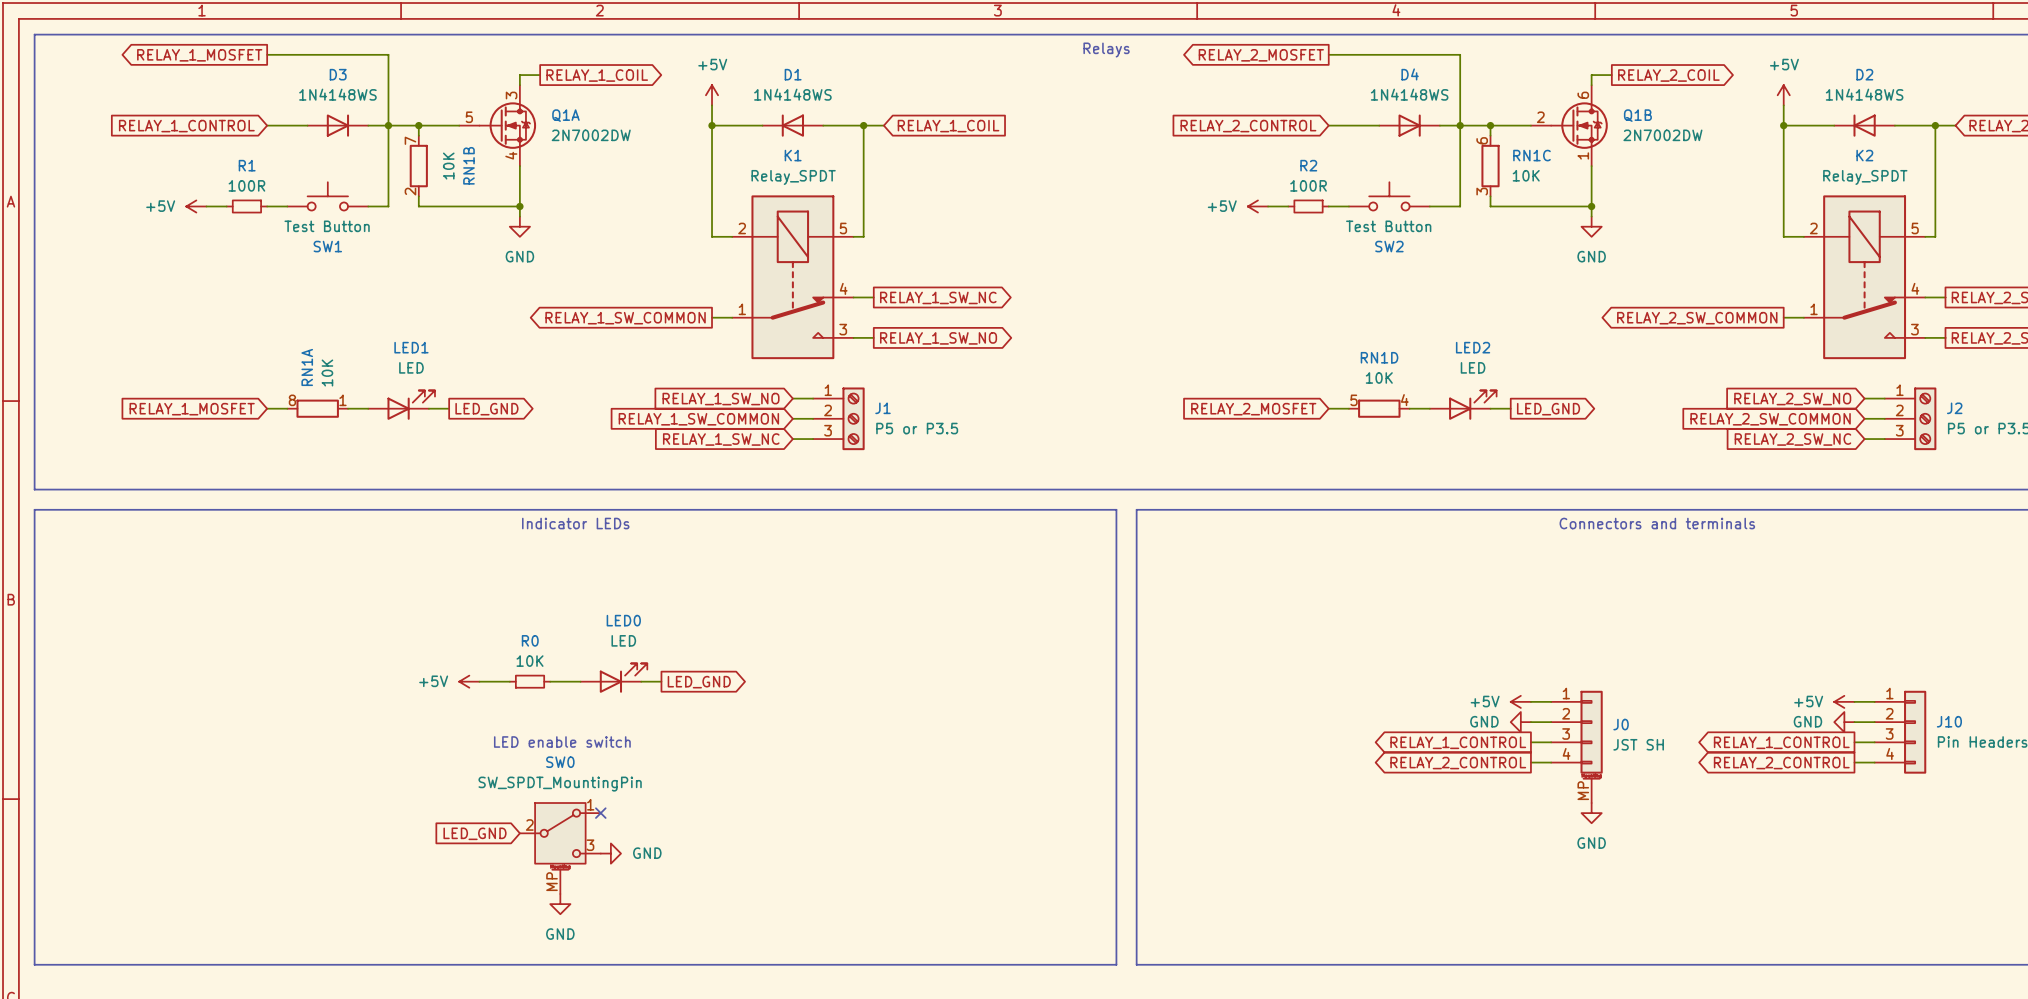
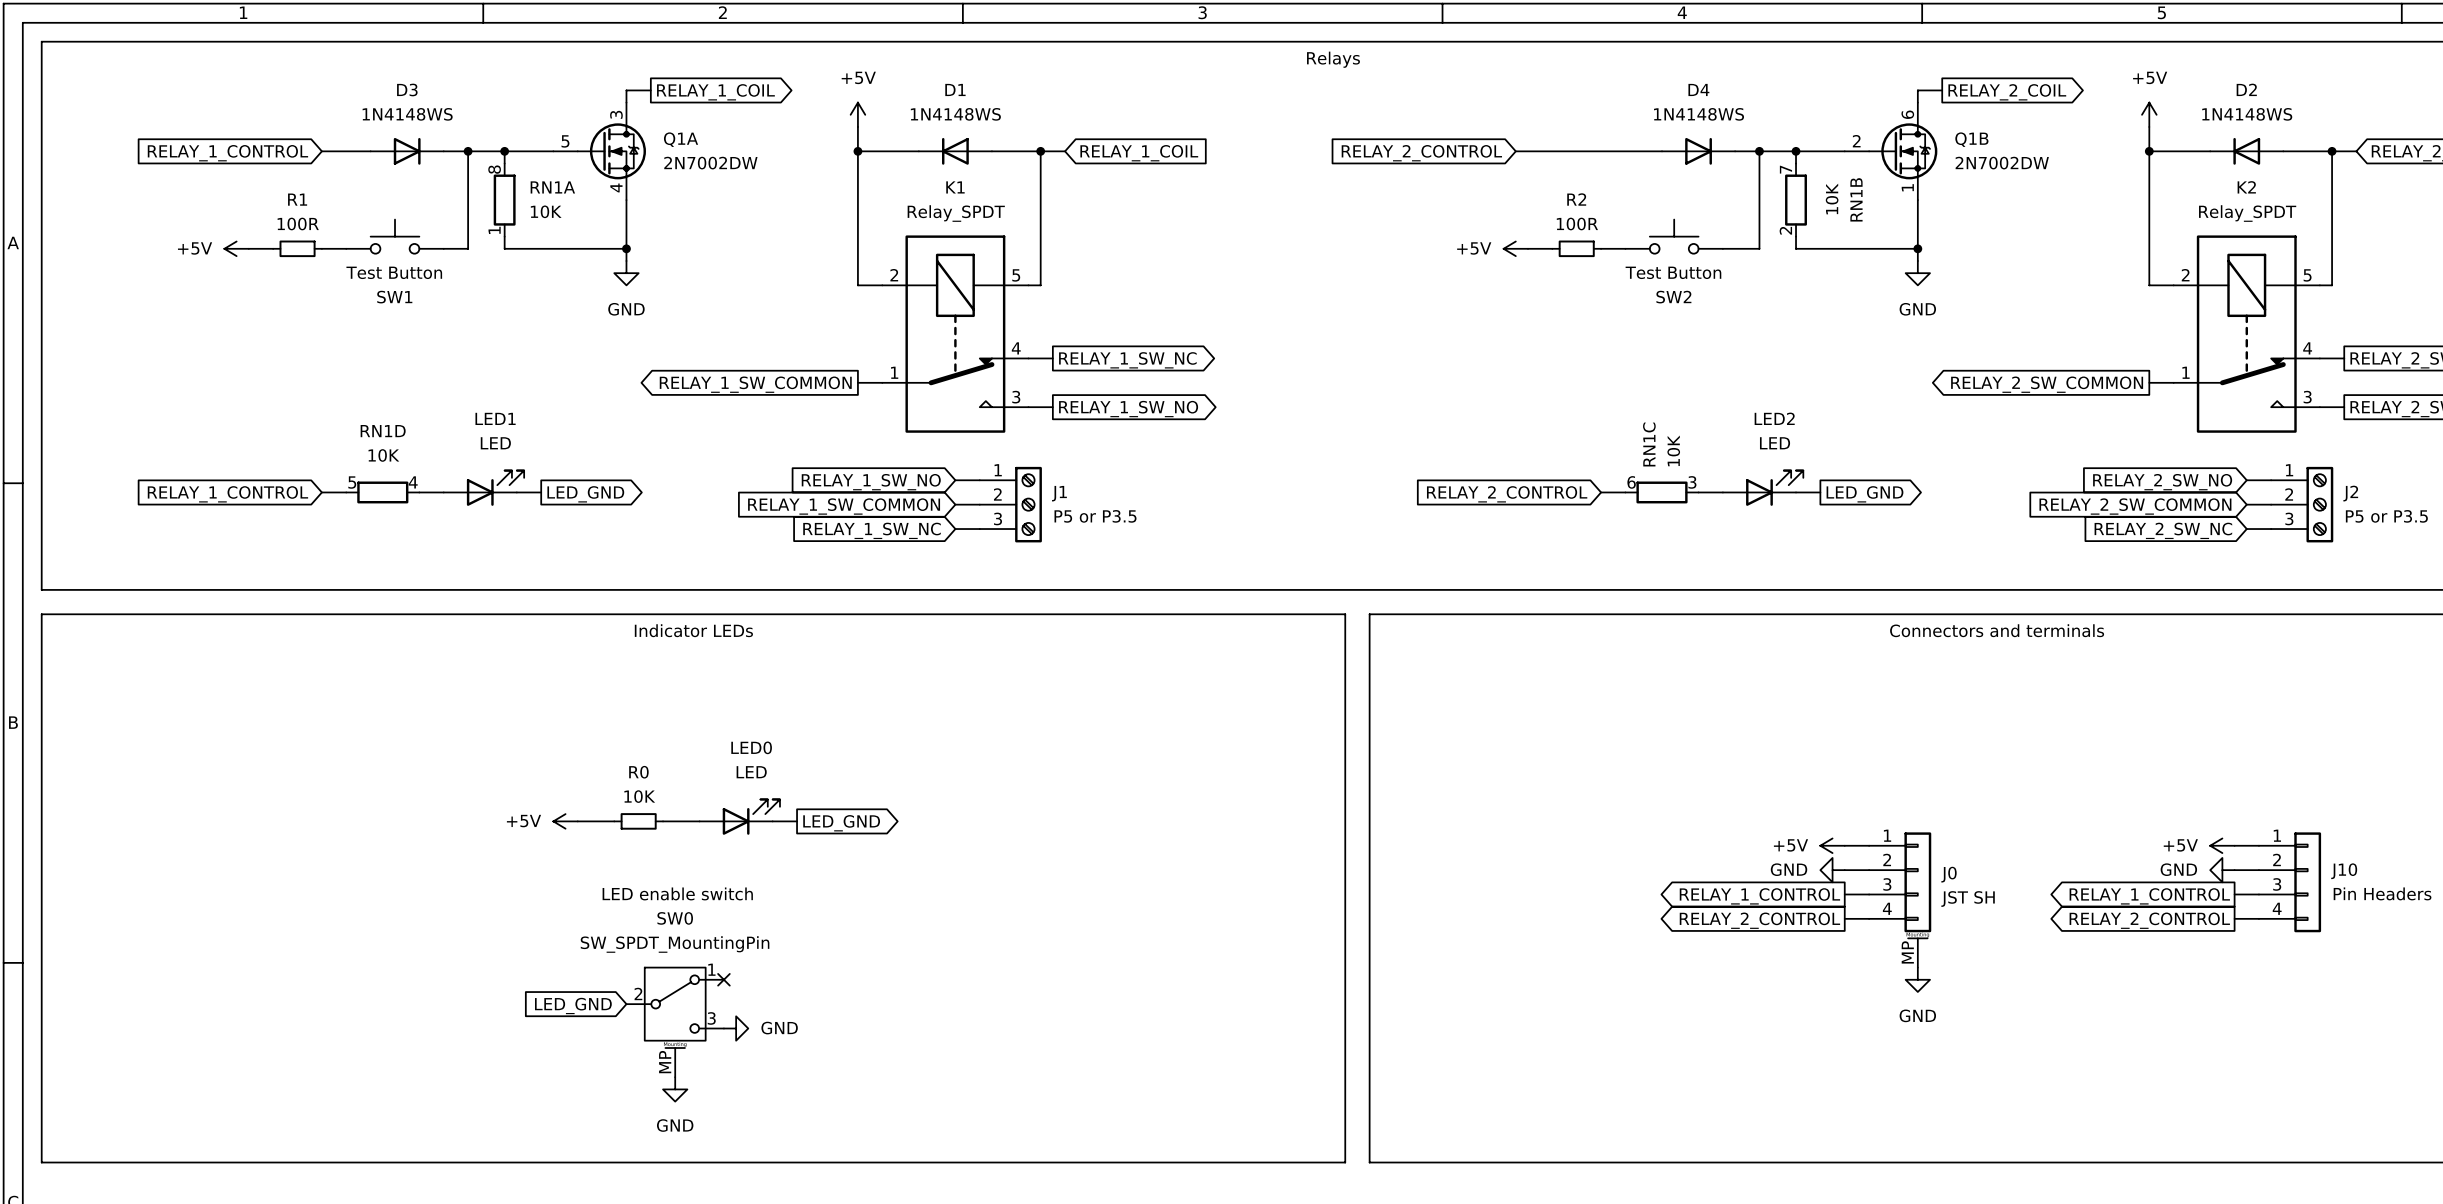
wire: (267, 54) (388, 54) (388, 125) -> none
wire: (1328, 54) (1460, 54) (1460, 125) -> none
global label: RELAY_1_MOSFET (199, 55) -> none
global label: RELAY_2_MOSFET (1261, 55) -> none
wire: none -> (1515, 151) (1601, 151)
global label position: RELAY_2_CONTROL (1248, 126) -> RELAY_2_CONTROL (1421, 153)
RN1B position: (418, 166) -> (1796, 200)
RN1C rotation: 0° (1490, 166) -> 90° counterclockwise (1662, 492)
RN1C position: (1490, 166) -> (1662, 492)
RN1A rotation: 0° (317, 408) -> 90° clockwise (504, 200)
RN1A position: (317, 408) -> (504, 200)
RN1D position: (1379, 408) -> (382, 492)
global label: RELAY_1_MOSFET (192, 409) -> RELAY_1_CONTROL (227, 494)
global label: RELAY_2_MOSFET (1253, 409) -> RELAY_2_CONTROL (1507, 494)

